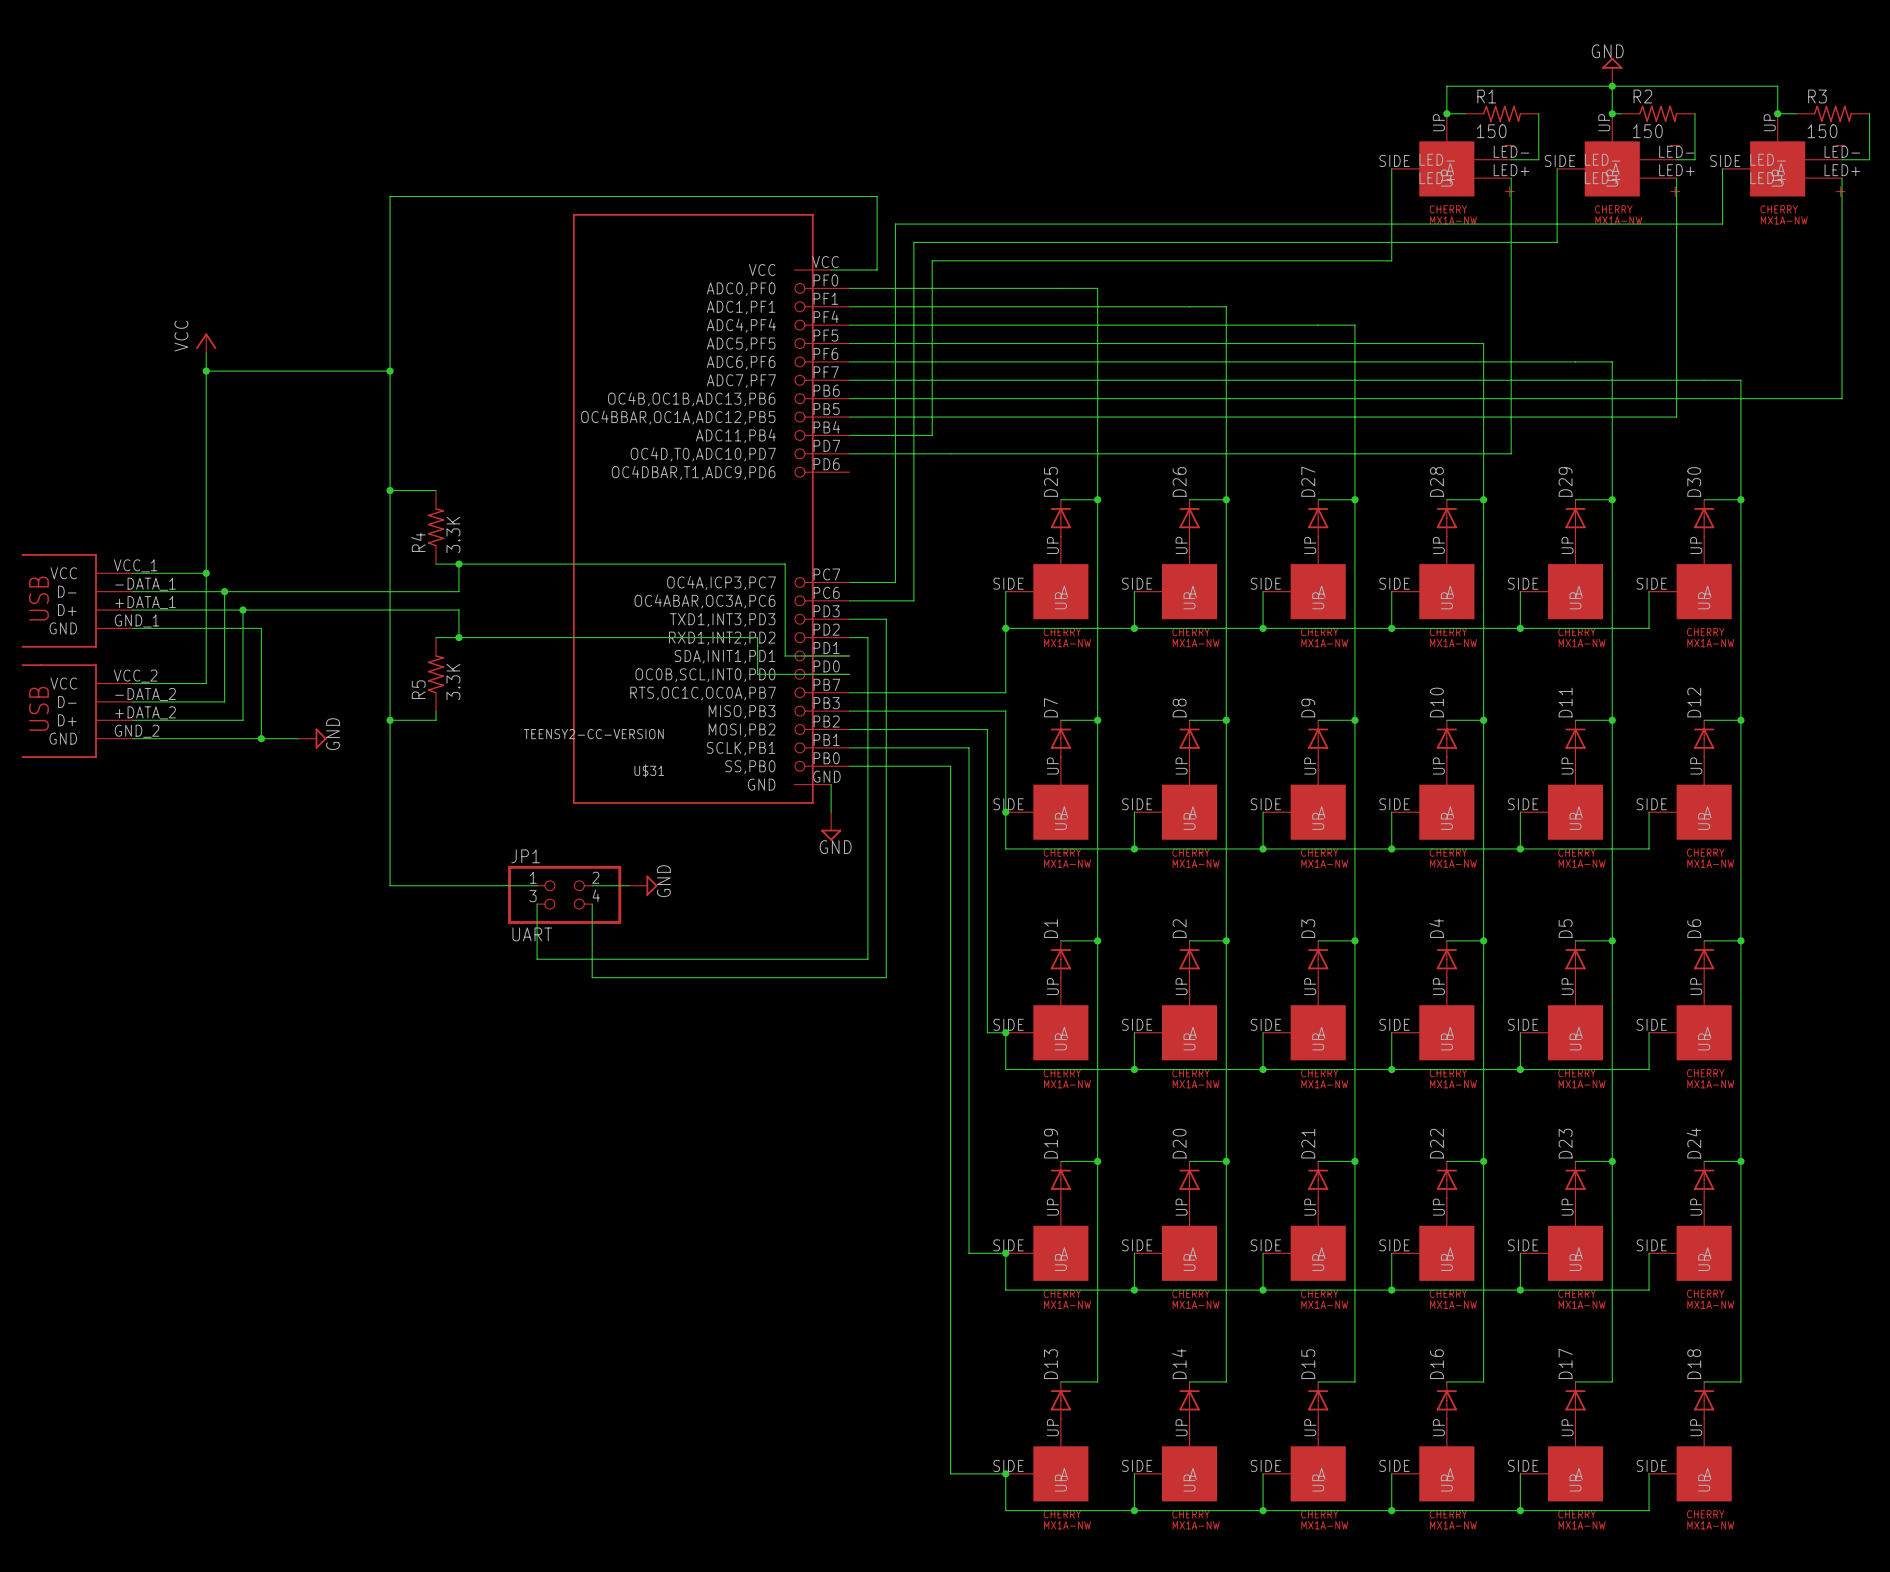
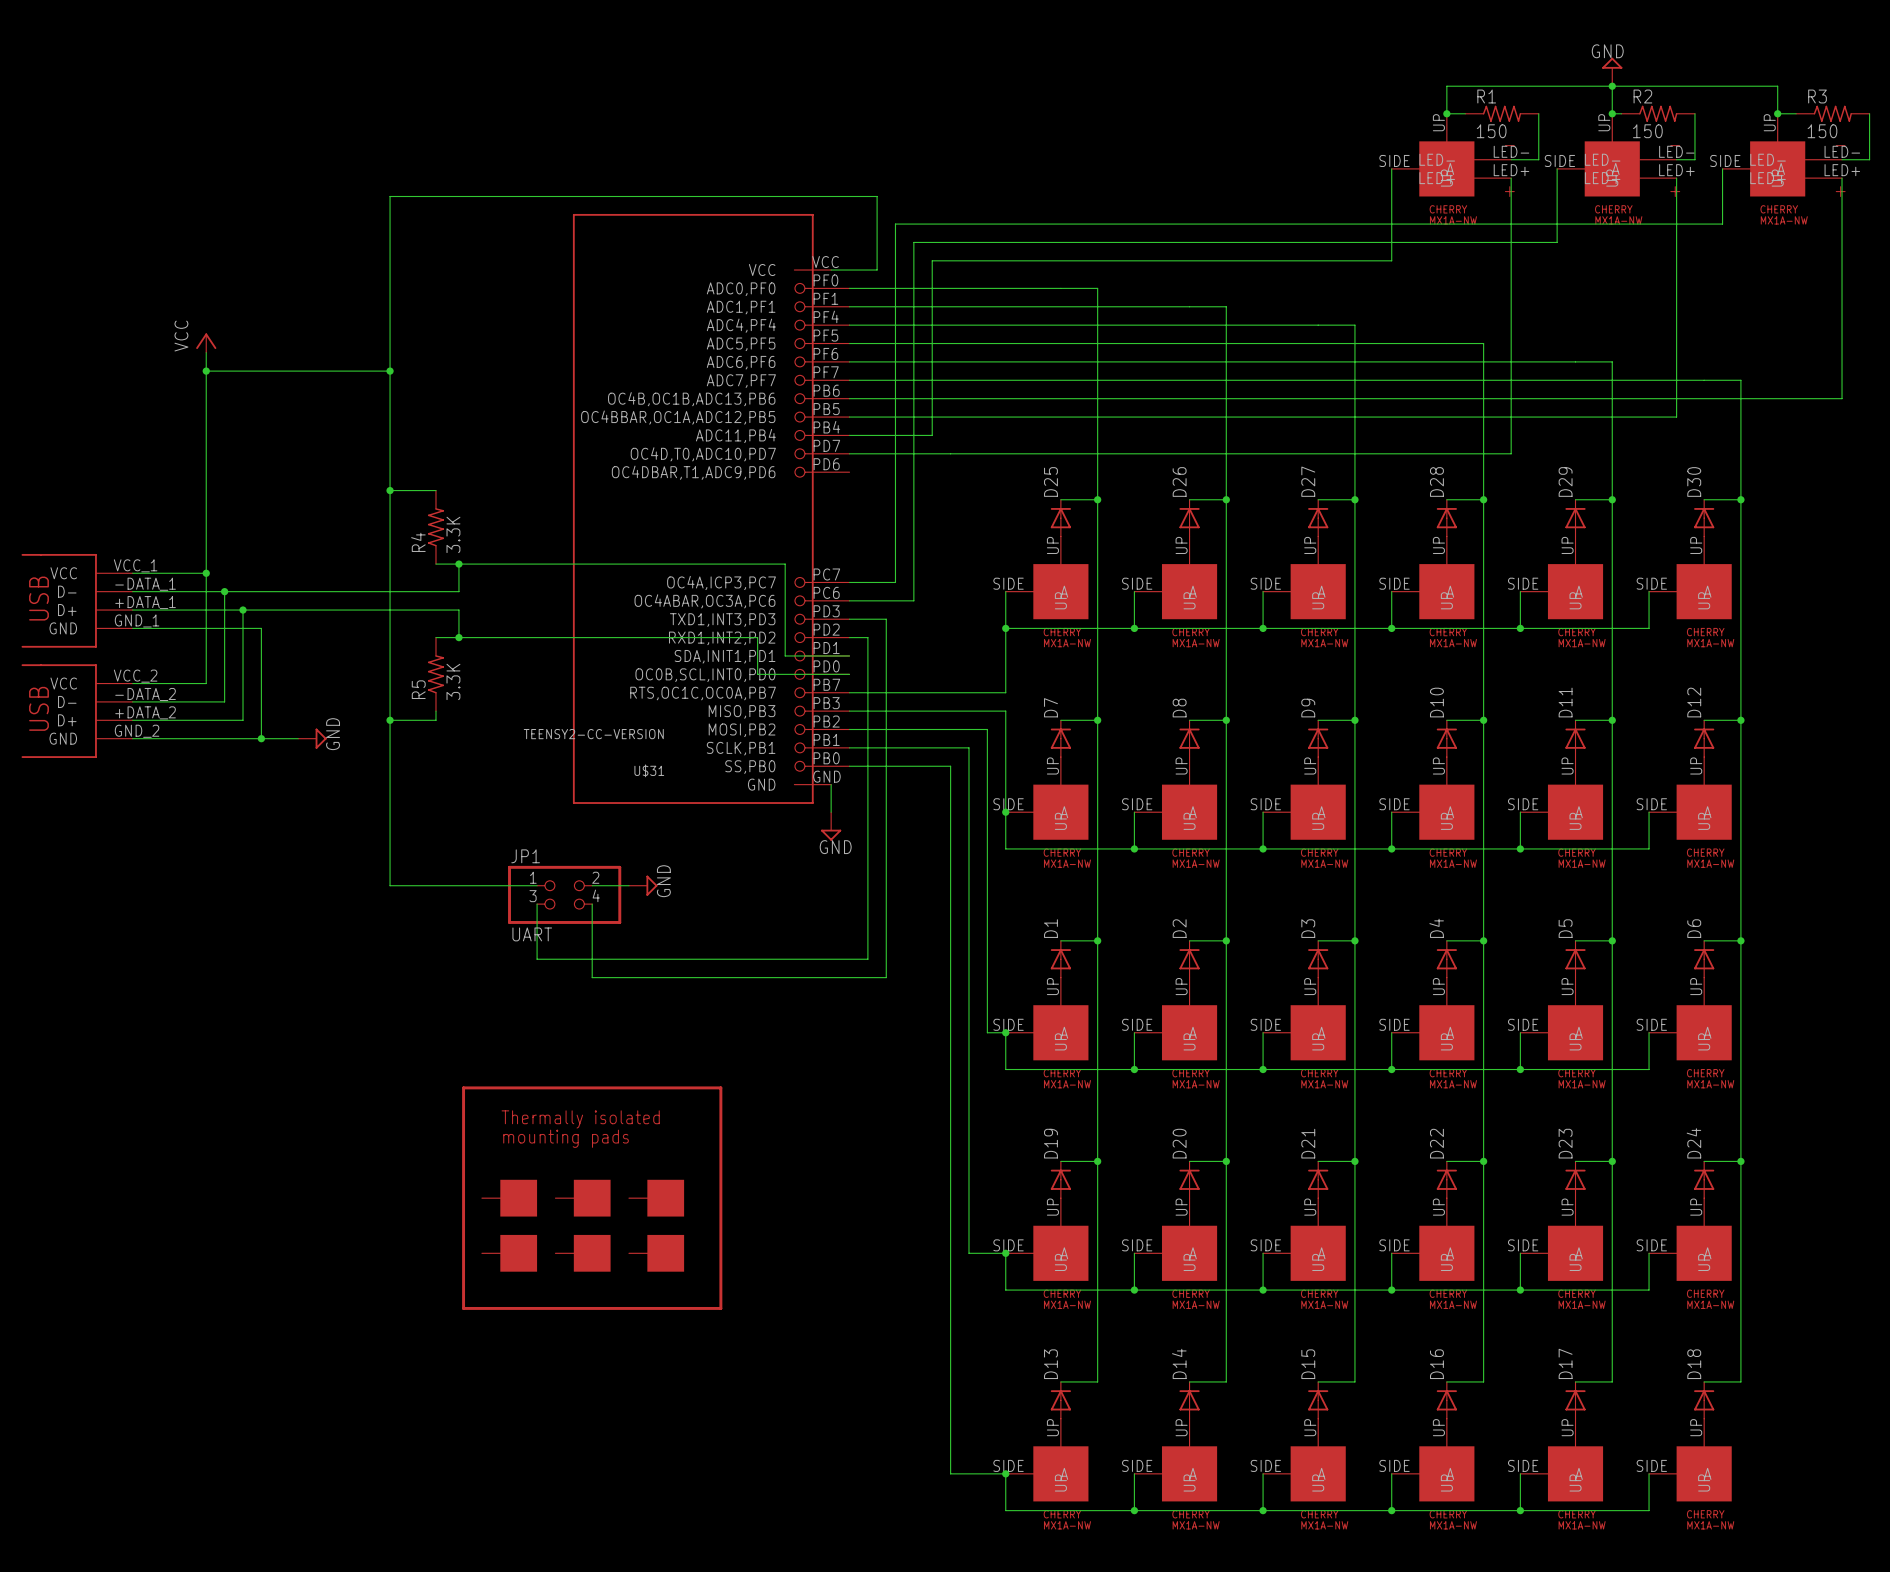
line: none -> (463, 1087) (720, 1087) (720, 1308) (463, 1308) (463, 1087)
text: none -> Thermally isolated (580, 1119)
text: none -> mounting pads (566, 1138)
part: none -> (509, 1198)
part: none -> (583, 1198)
part: none -> (656, 1198)
part: none -> (509, 1253)
part: none -> (583, 1253)
part: none -> (656, 1253)

